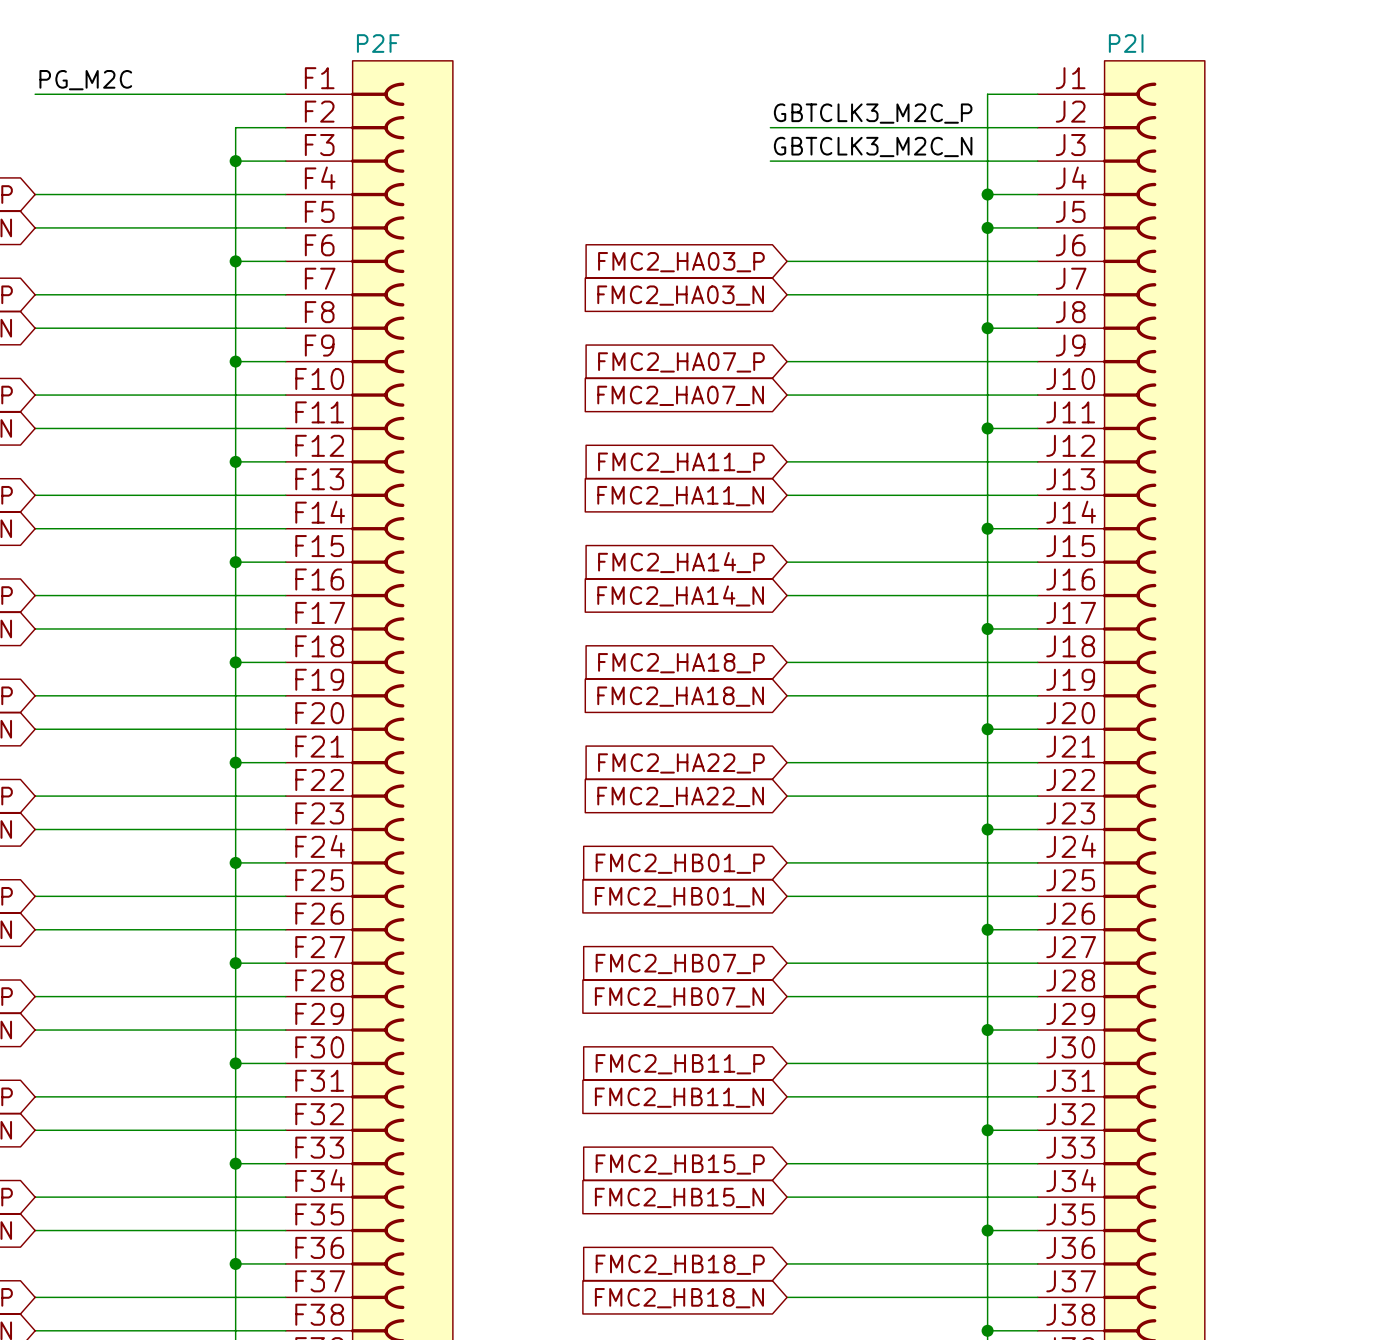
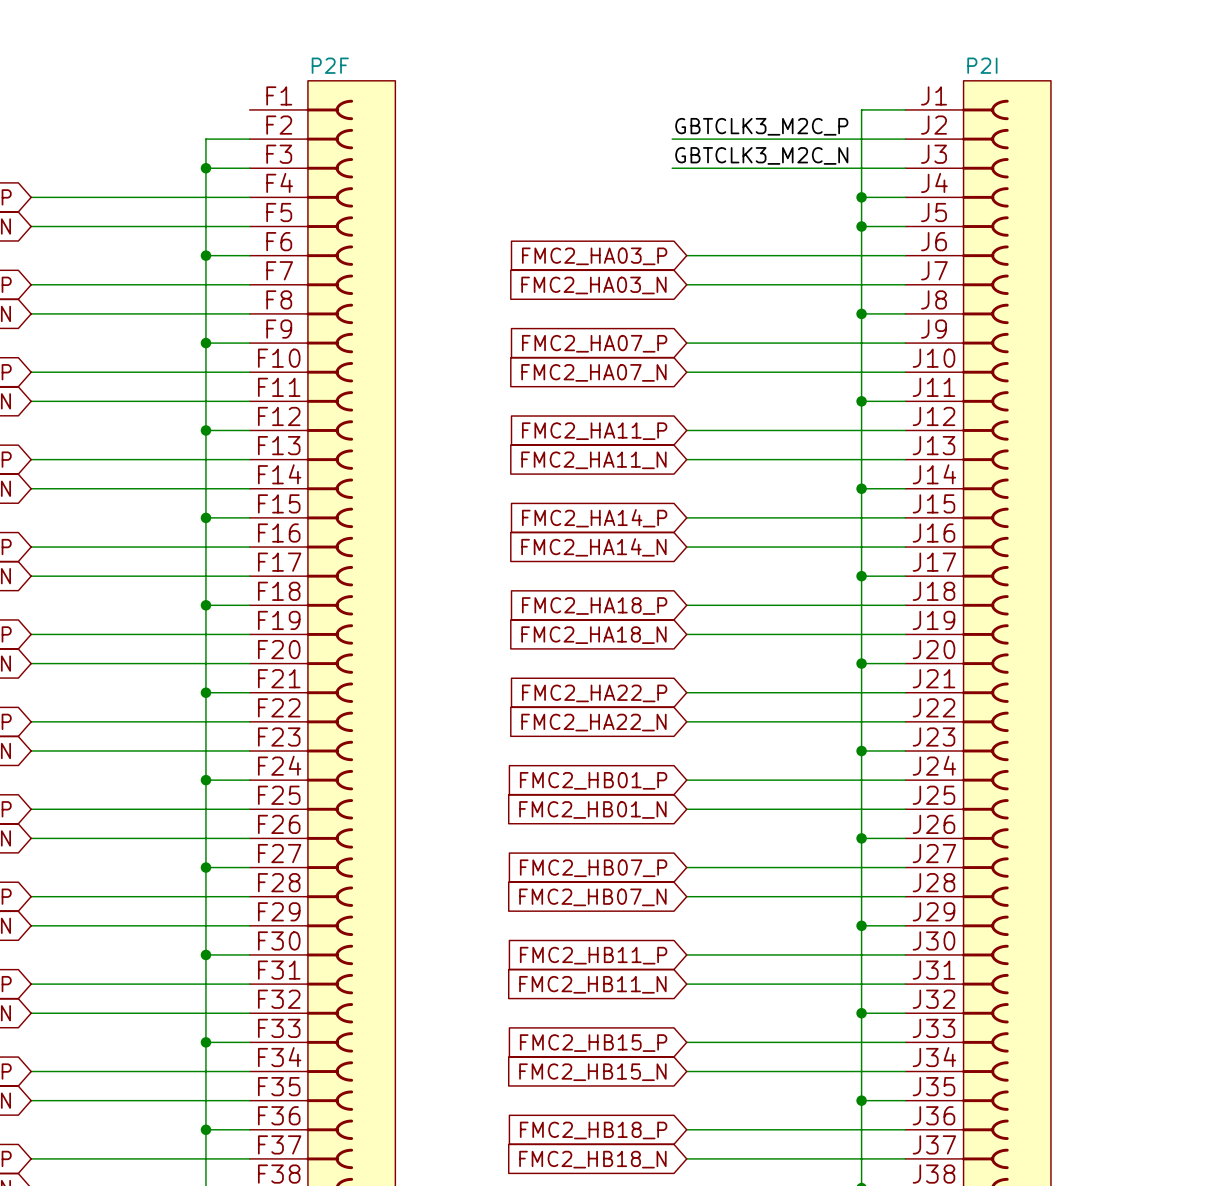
label: PG_M2C (85, 80) -> none
wire: (35, 94) (285, 94) -> none

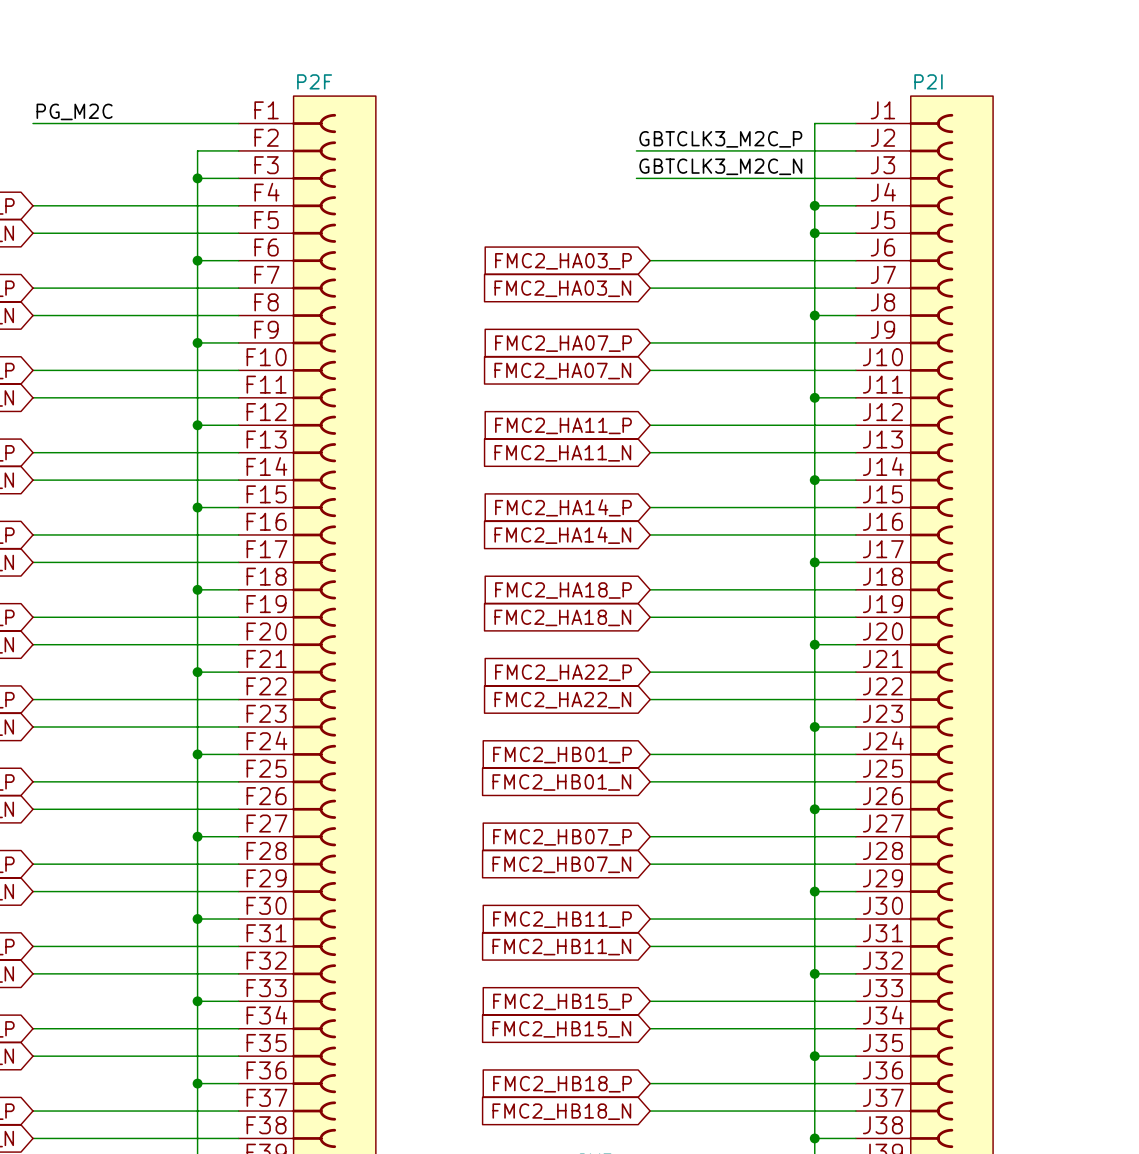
label: none -> PG_M2C (74, 111)
wire: none -> (32, 123) (238, 123)

